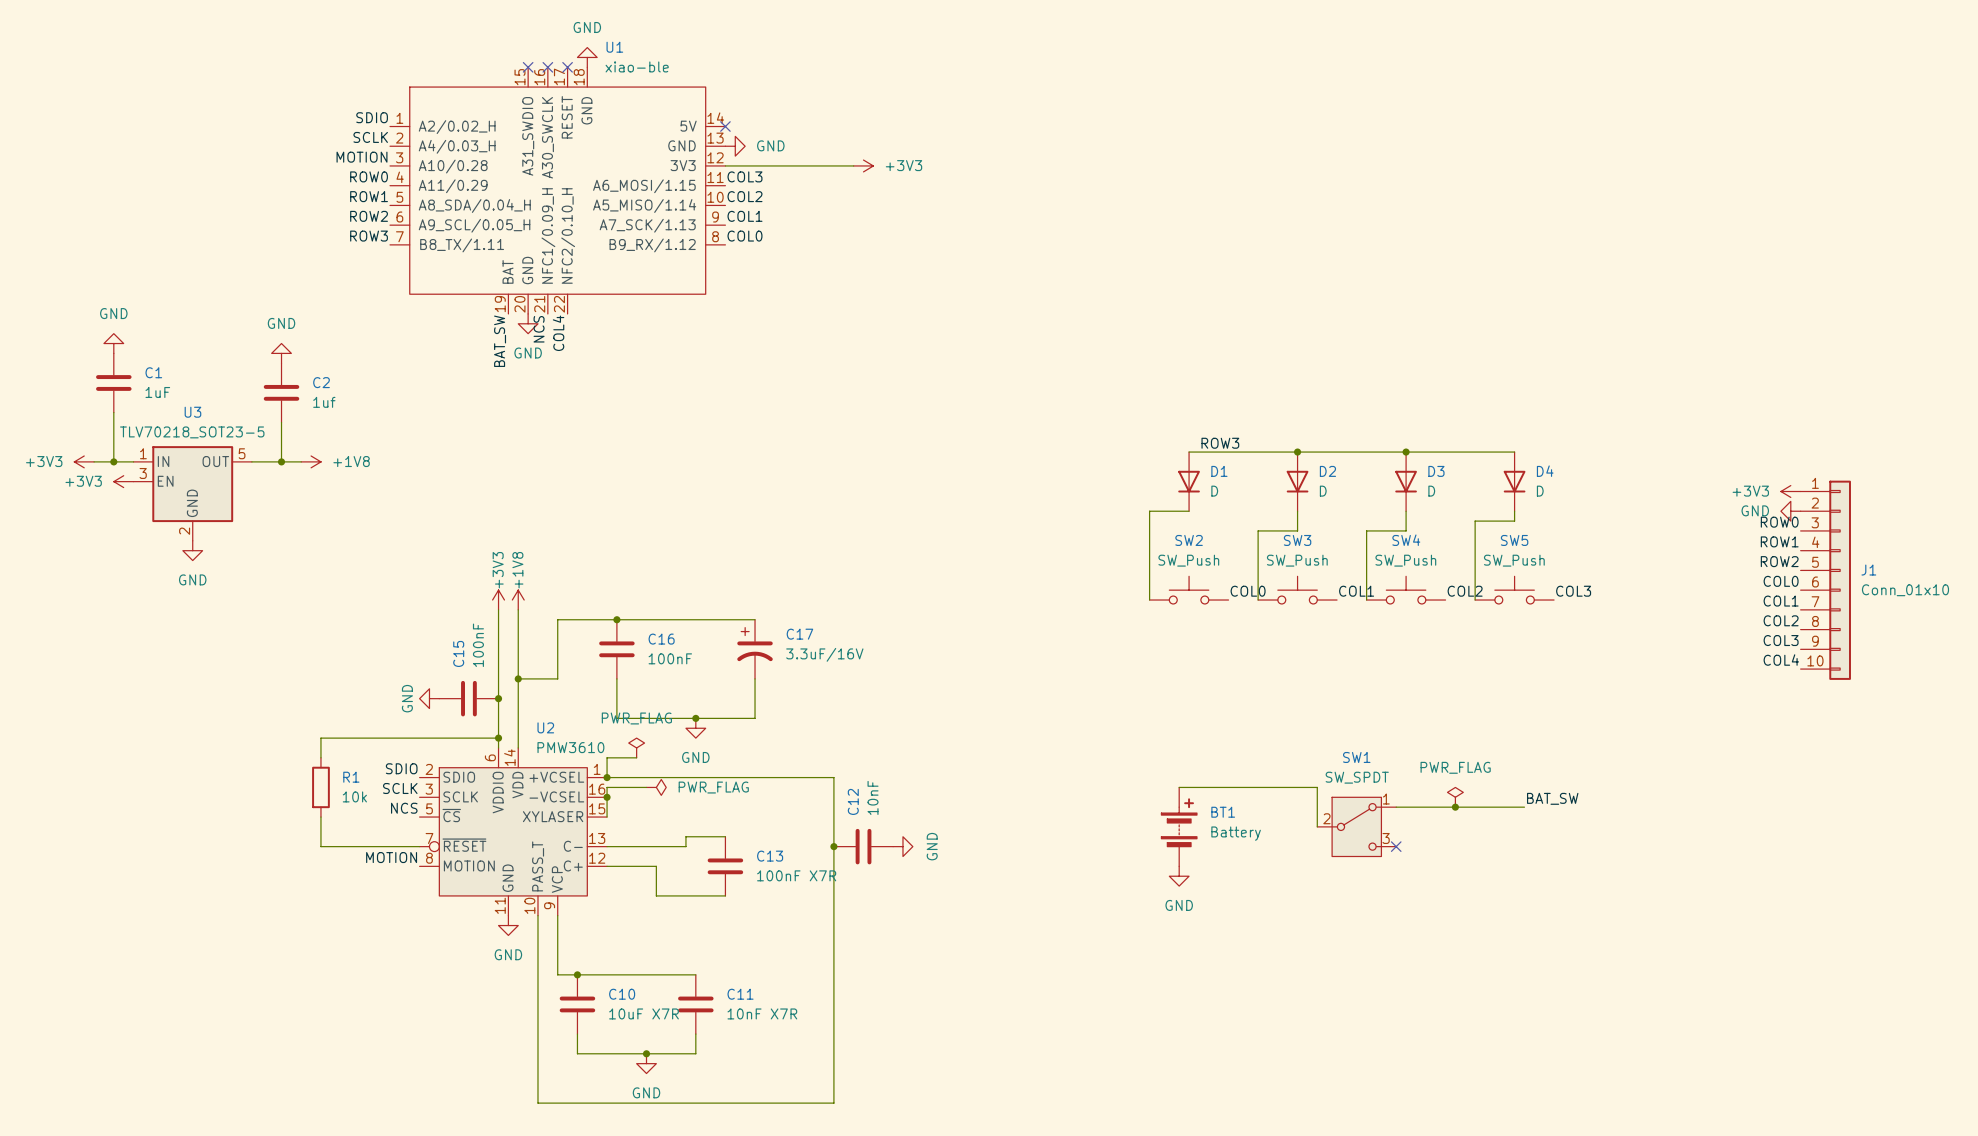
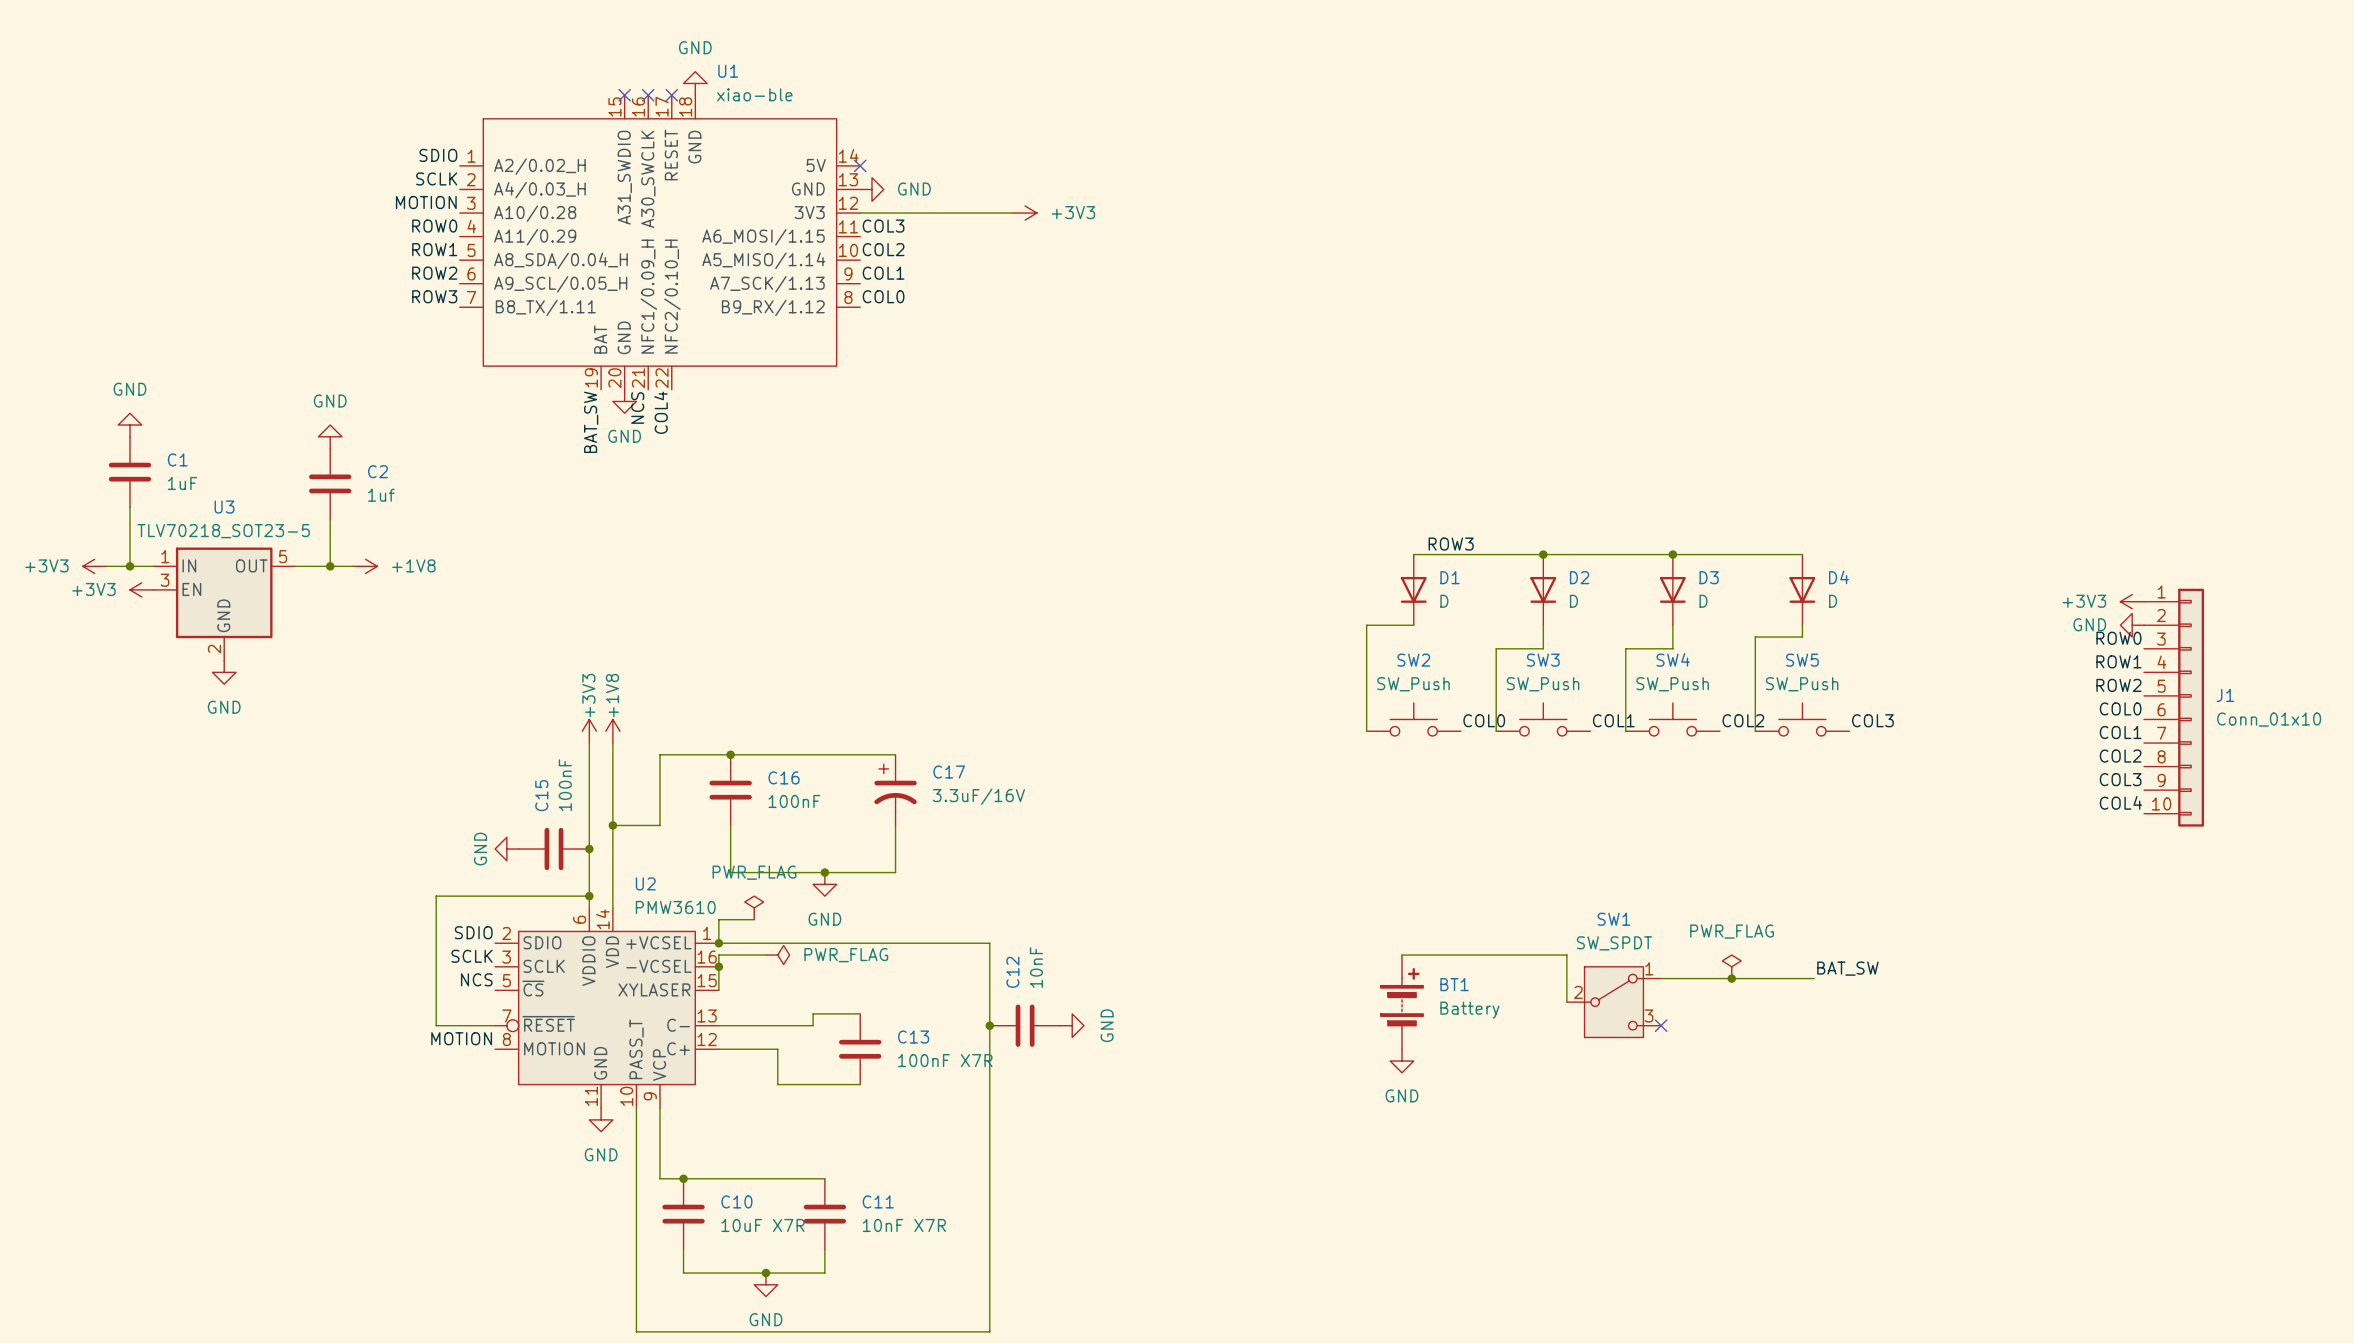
wire: (370, 738) (320, 738) (320, 757) -> none
R1: 10k (320, 787) -> none
wire: (320, 817) (320, 846) (370, 846) -> (436, 896) (436, 1025)

